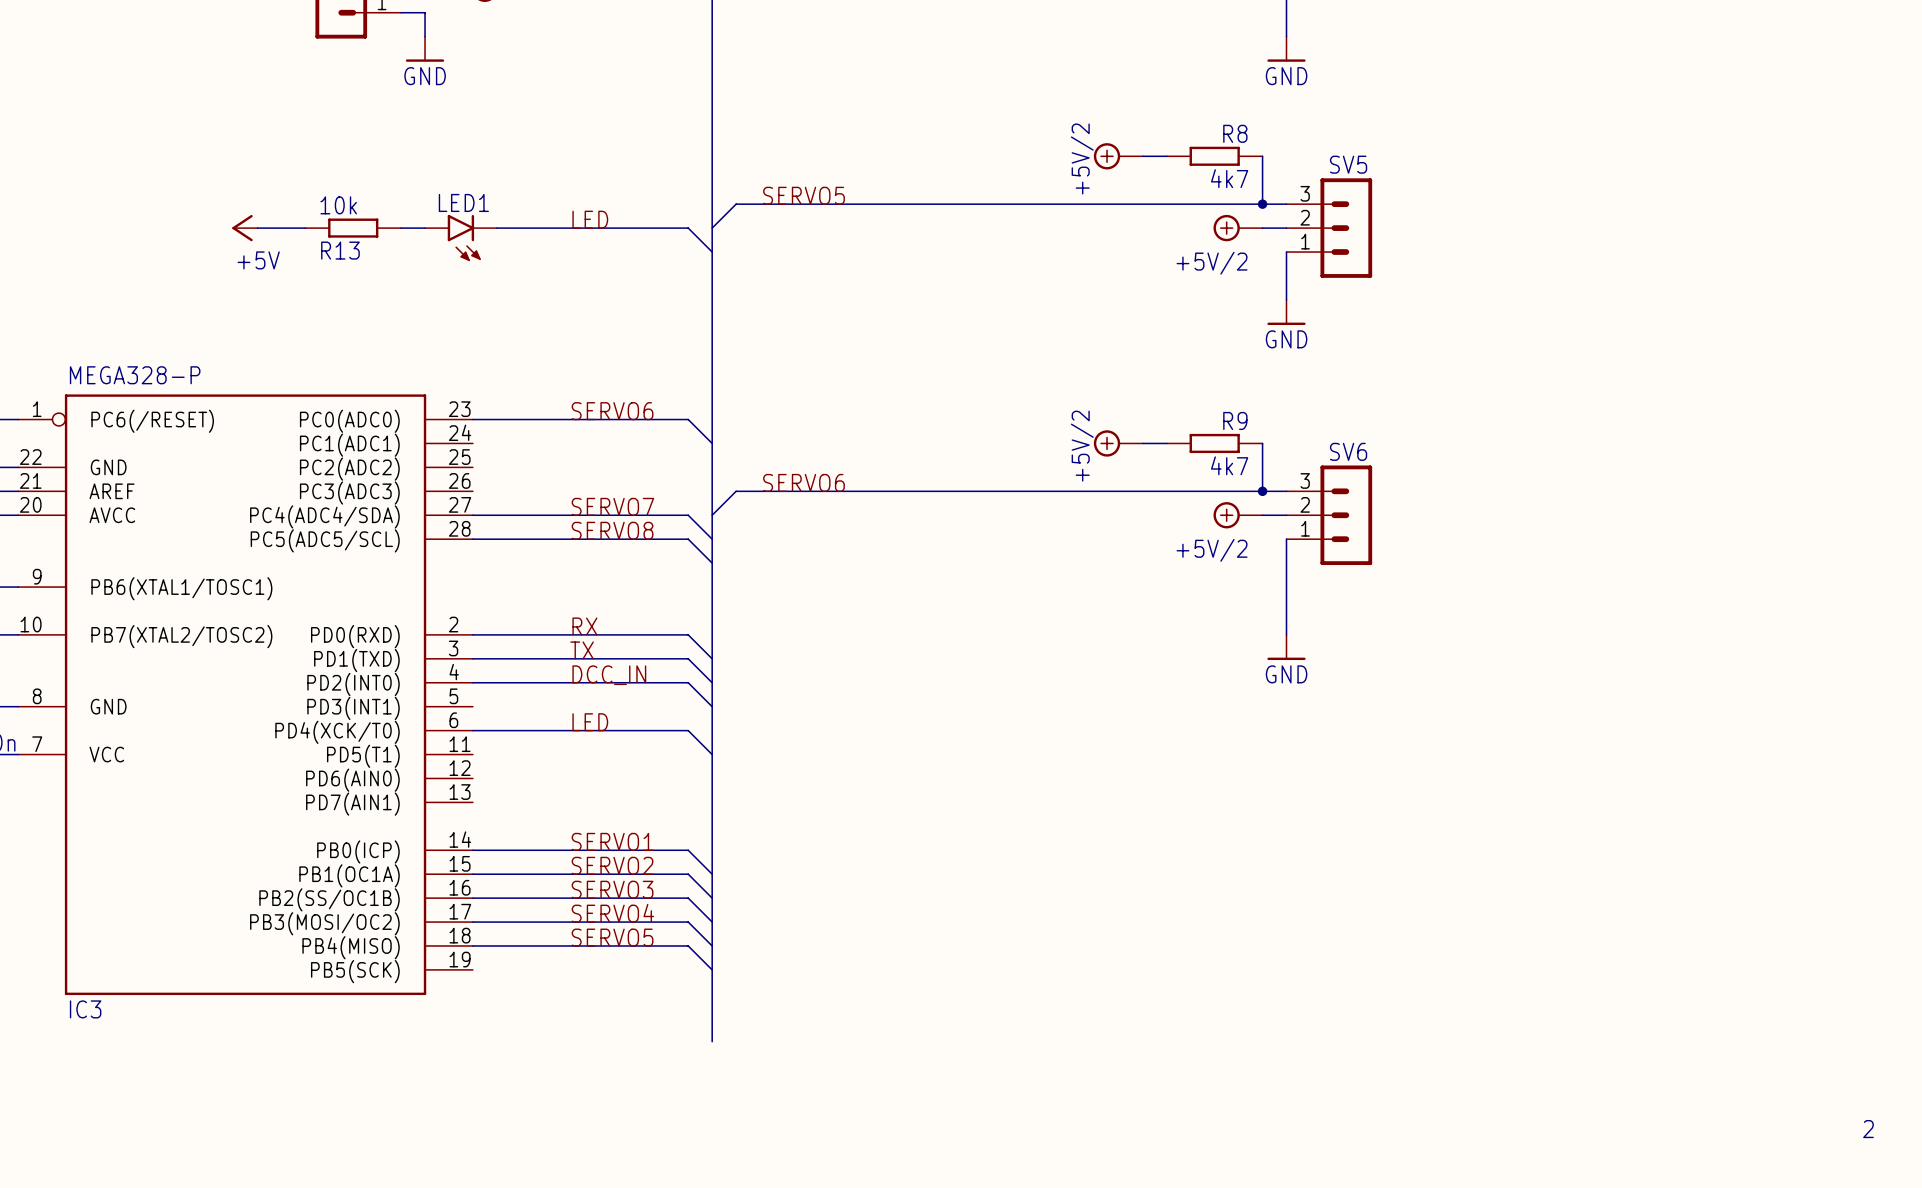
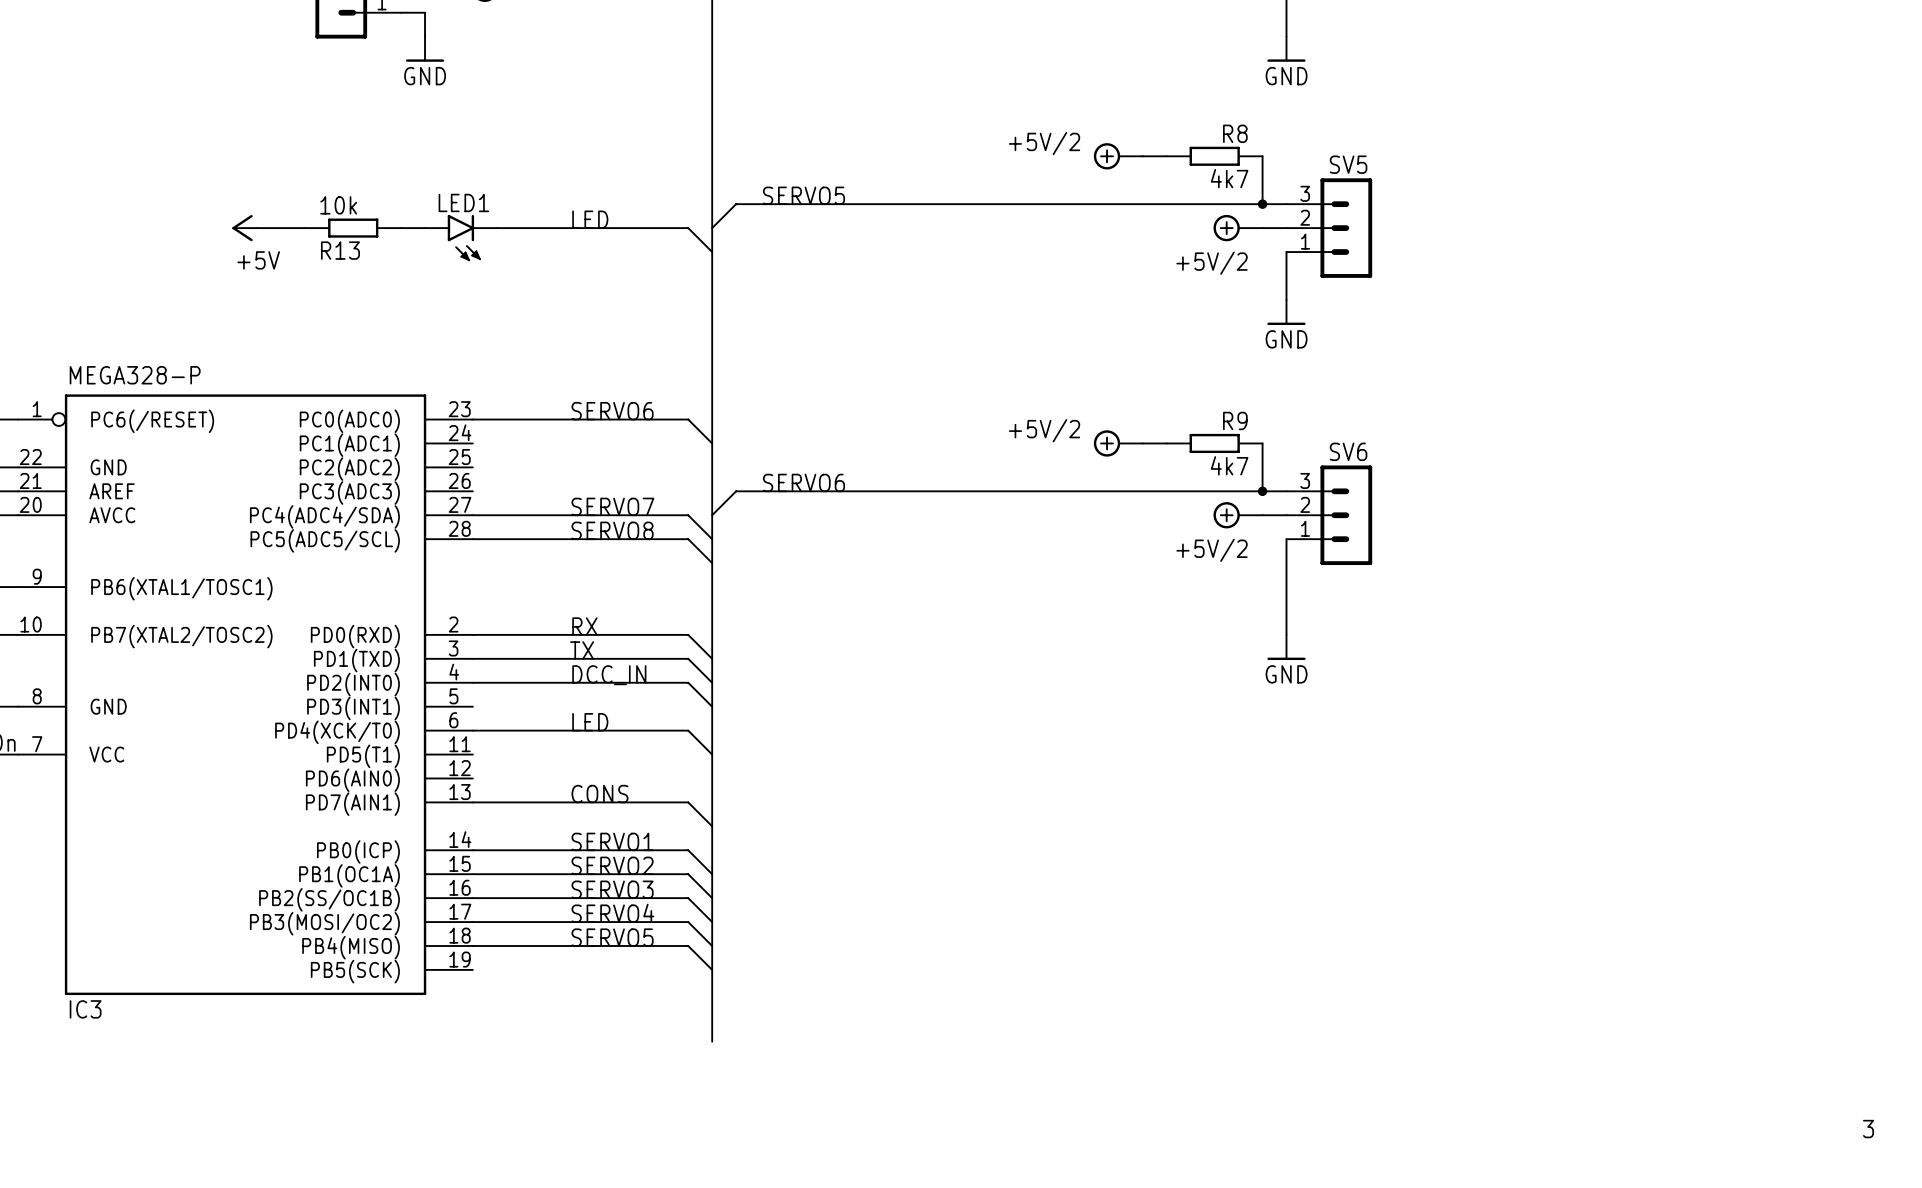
power symbol text rotation: 0° (1082, 158) -> 90° clockwise (1044, 143)
power symbol text rotation: 0° (1082, 446) -> 90° clockwise (1044, 430)
label: none -> CONS (599, 794)
wire: none -> (472, 802) (688, 802) (712, 826)
text: 2 (1868, 1129) -> 3 (1868, 1129)

